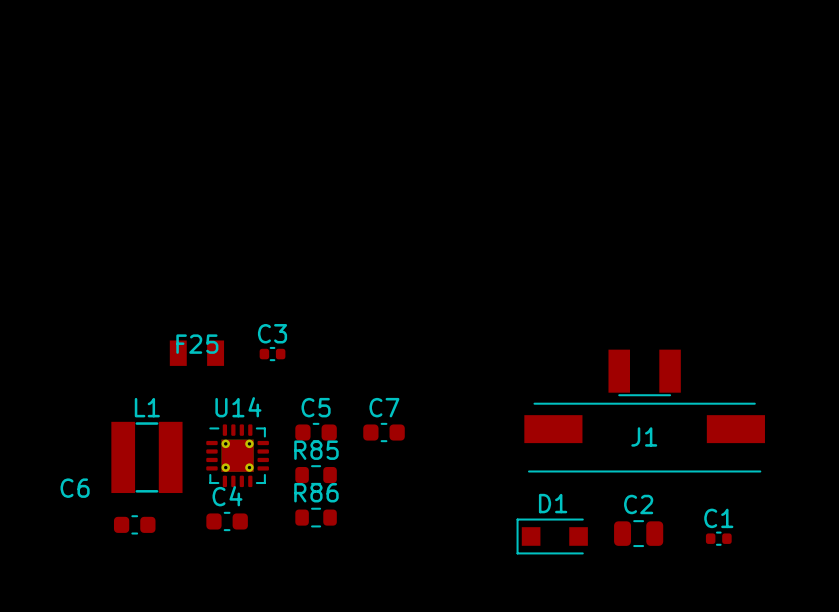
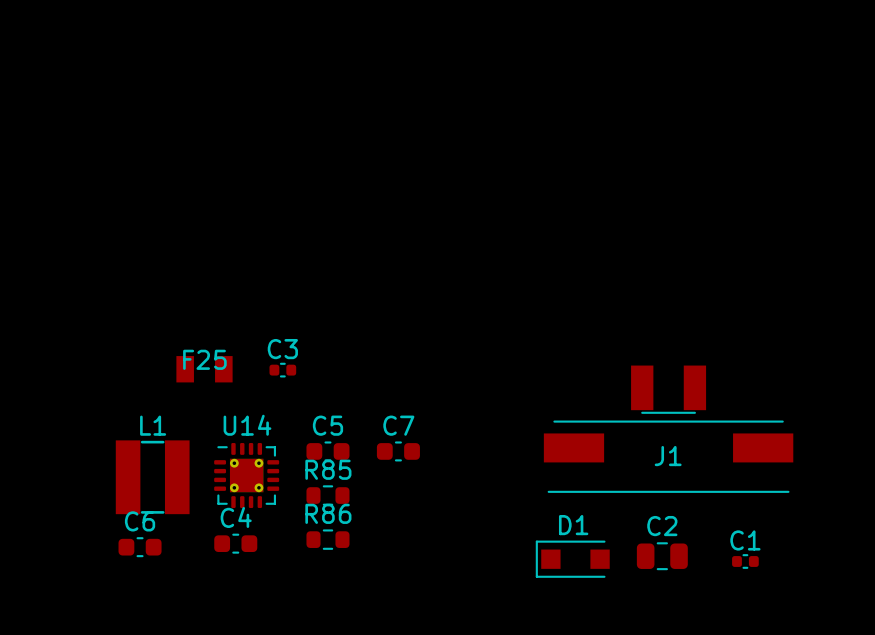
C6 name position: C6 (75, 488) -> C6 (140, 521)

